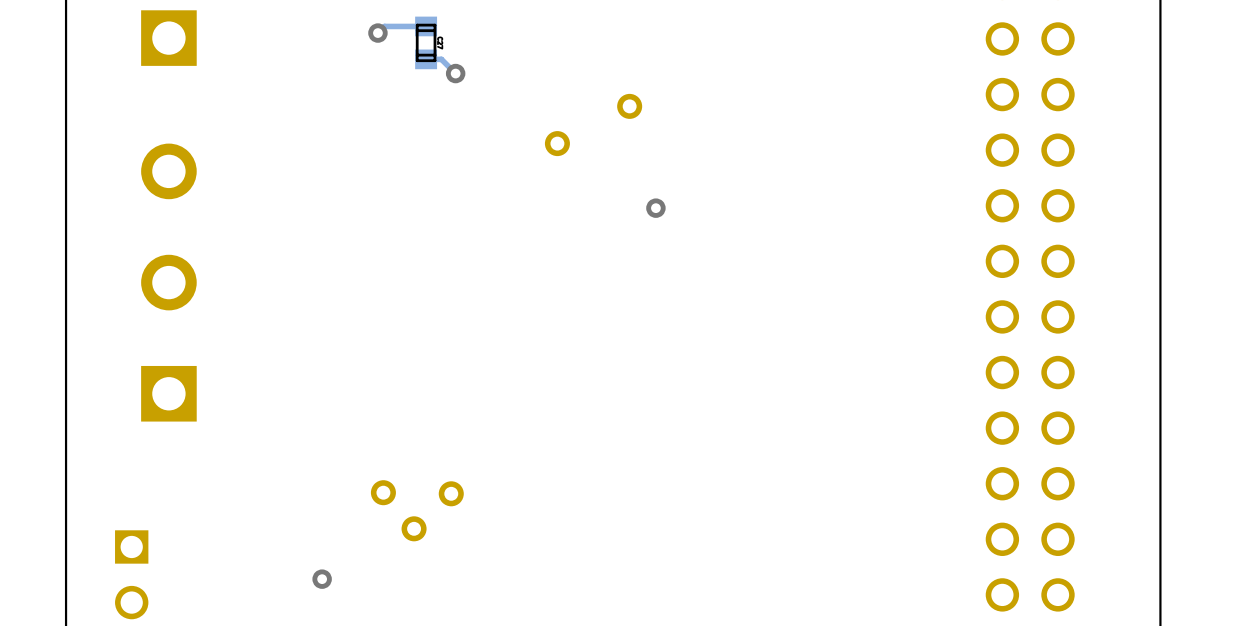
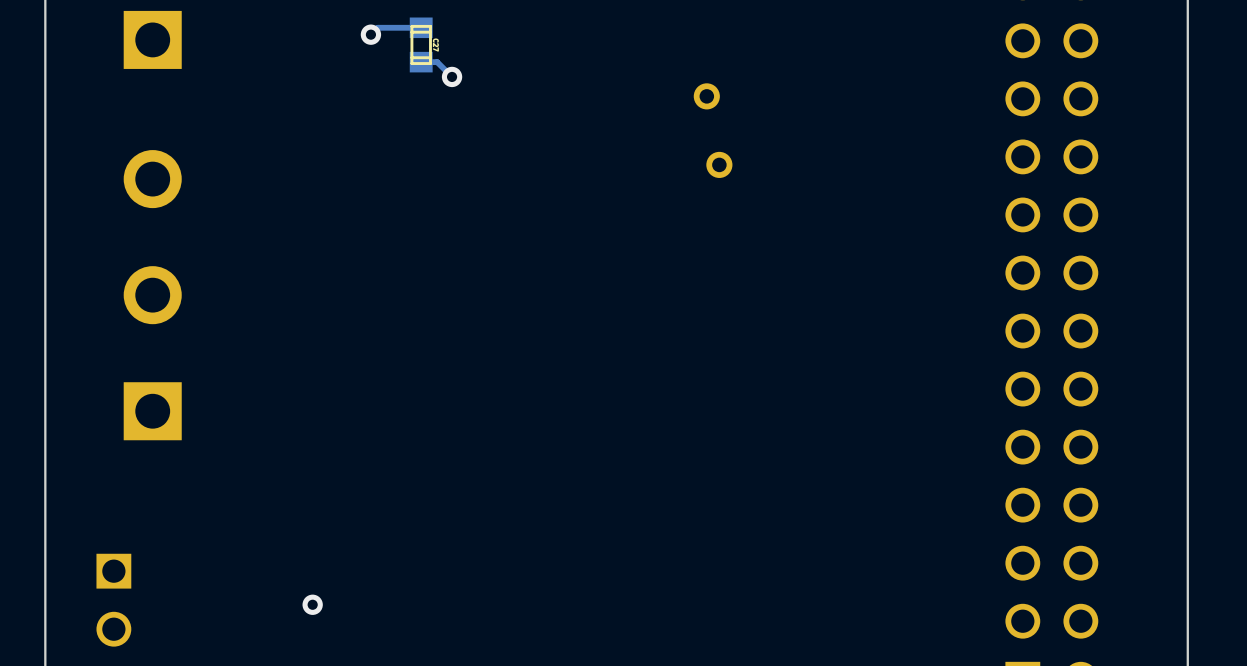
part: none -> (706, 96)
part: (629, 106) -> none
part: (557, 143) -> none
part: none -> (719, 164)
via: (655, 208) -> none
part: (383, 492) -> none
part: (451, 493) -> none
part: (414, 528) -> none

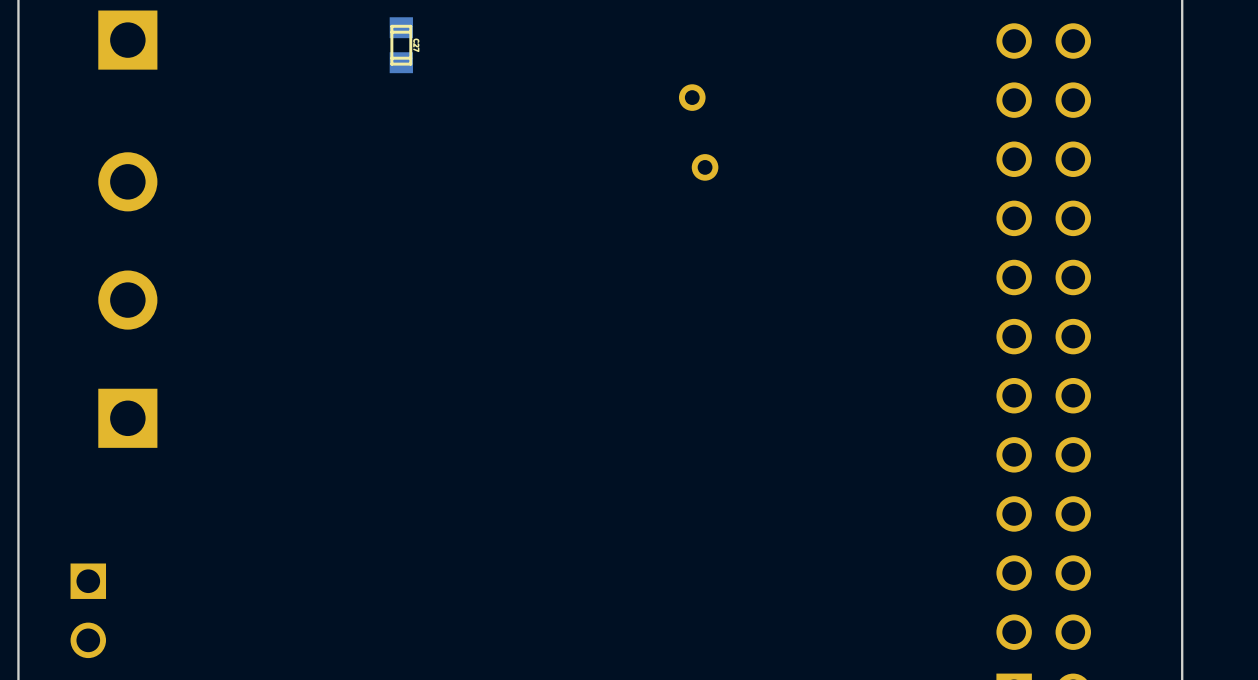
track: (421, 27) (377, 27) (370, 34) -> none
via: (370, 34) -> none
track: (421, 62) (437, 62) (452, 76) -> none
via: (452, 76) -> none
via: (312, 604) -> none

